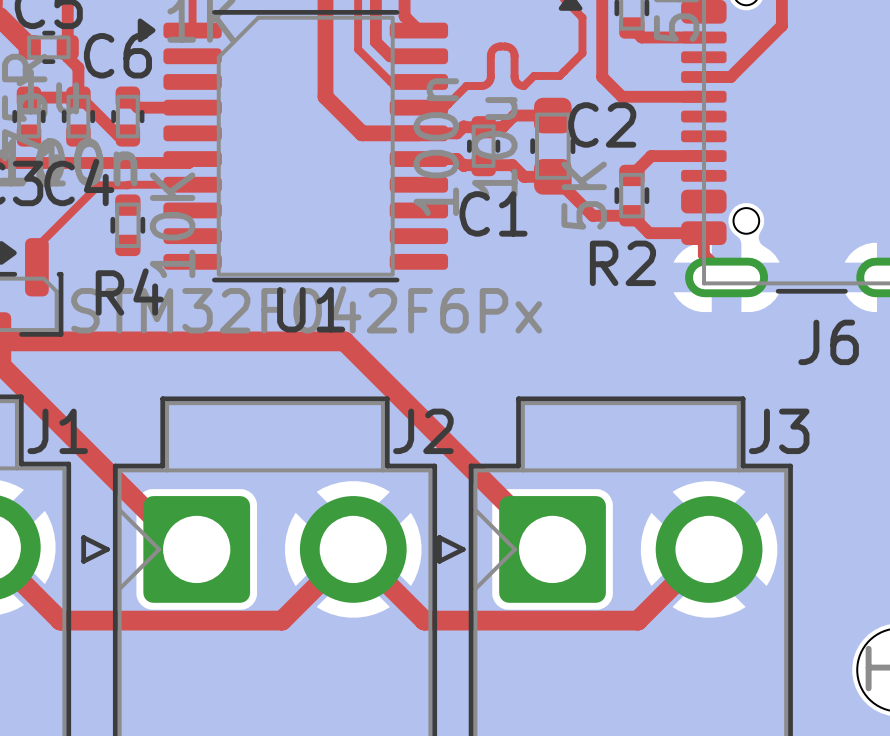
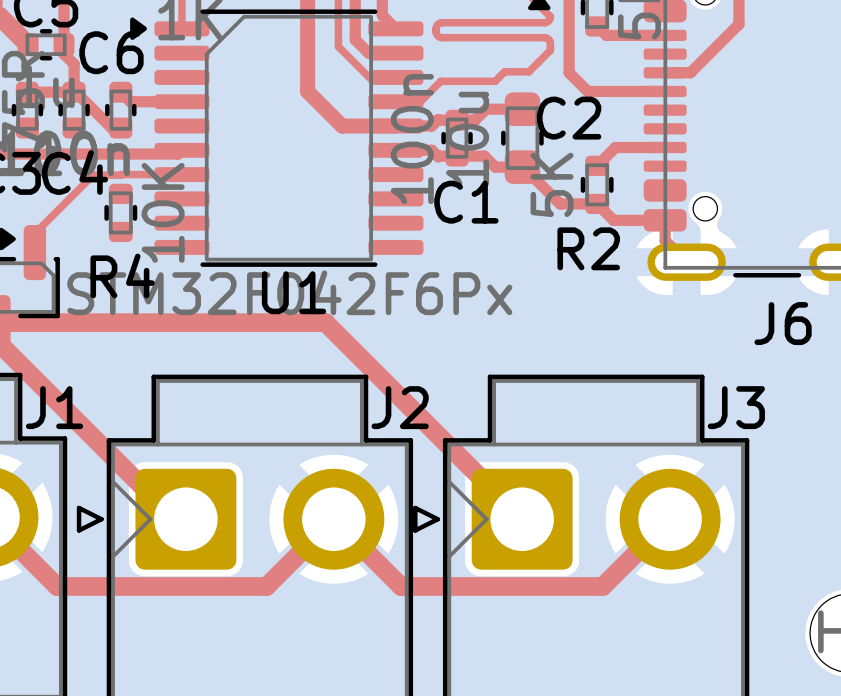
top track: (582, 17) (582, 46) -> (550, 16) (545, 22) (442, 22) (437, 24) (436, 28) (436, 34) (441, 37) (544, 37) (548, 39) (550, 43)
top track: (481, 86) (489, 80) (491, 52) (494, 48) (500, 46) (508, 47) (513, 50) (515, 79) (519, 84) (524, 86) -> (454, 81) (495, 81)

